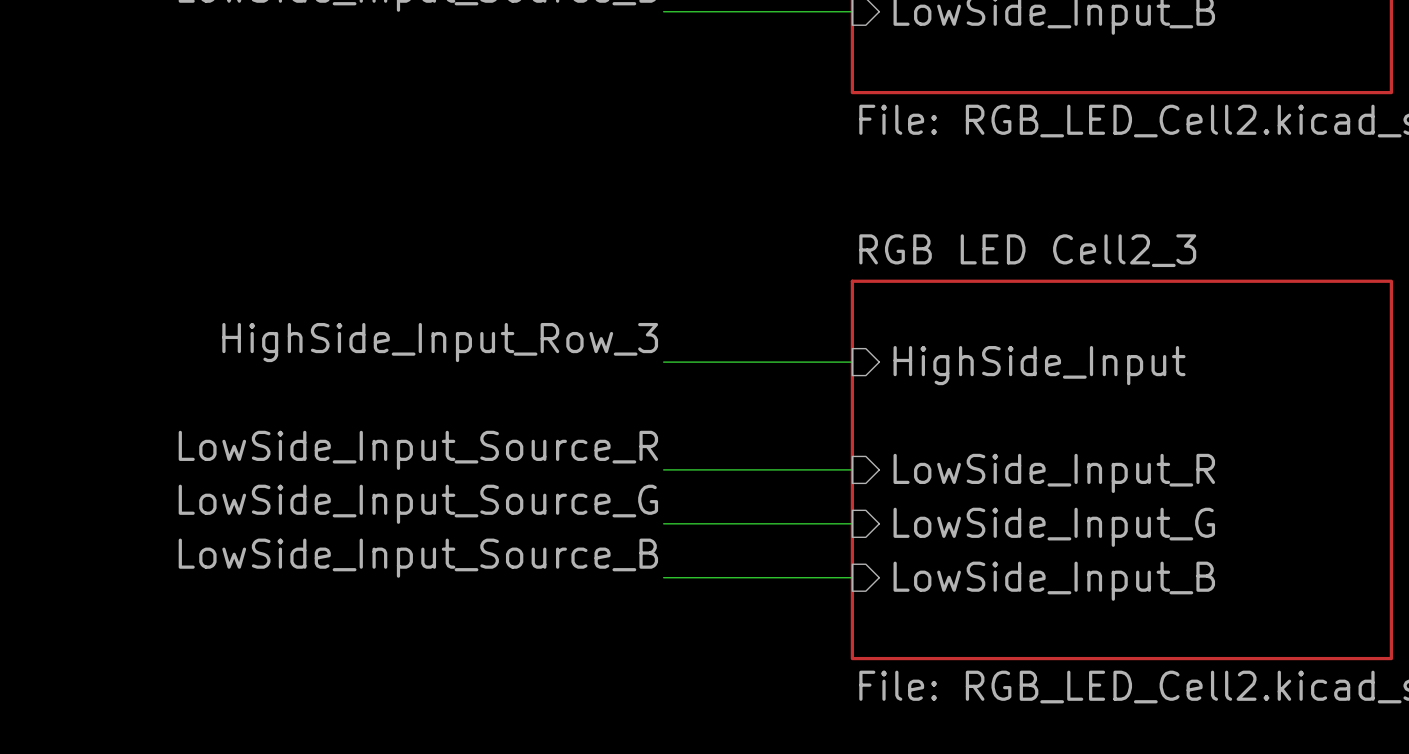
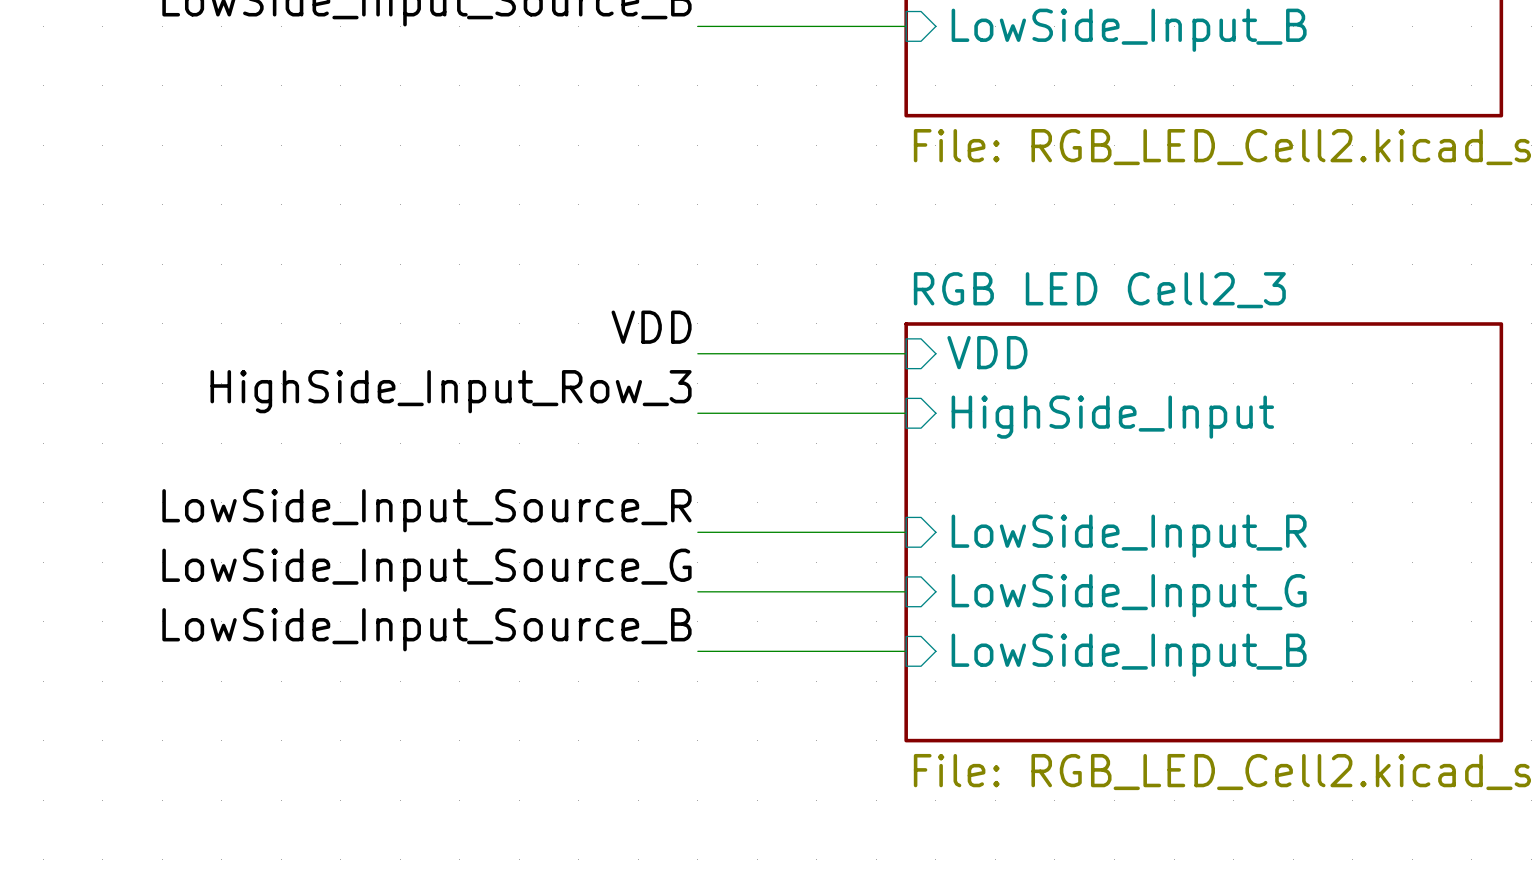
label: none -> VDD (651, 327)
sheet pin: none -> VDD (987, 352)
wire: none -> (697, 353) (906, 353)

